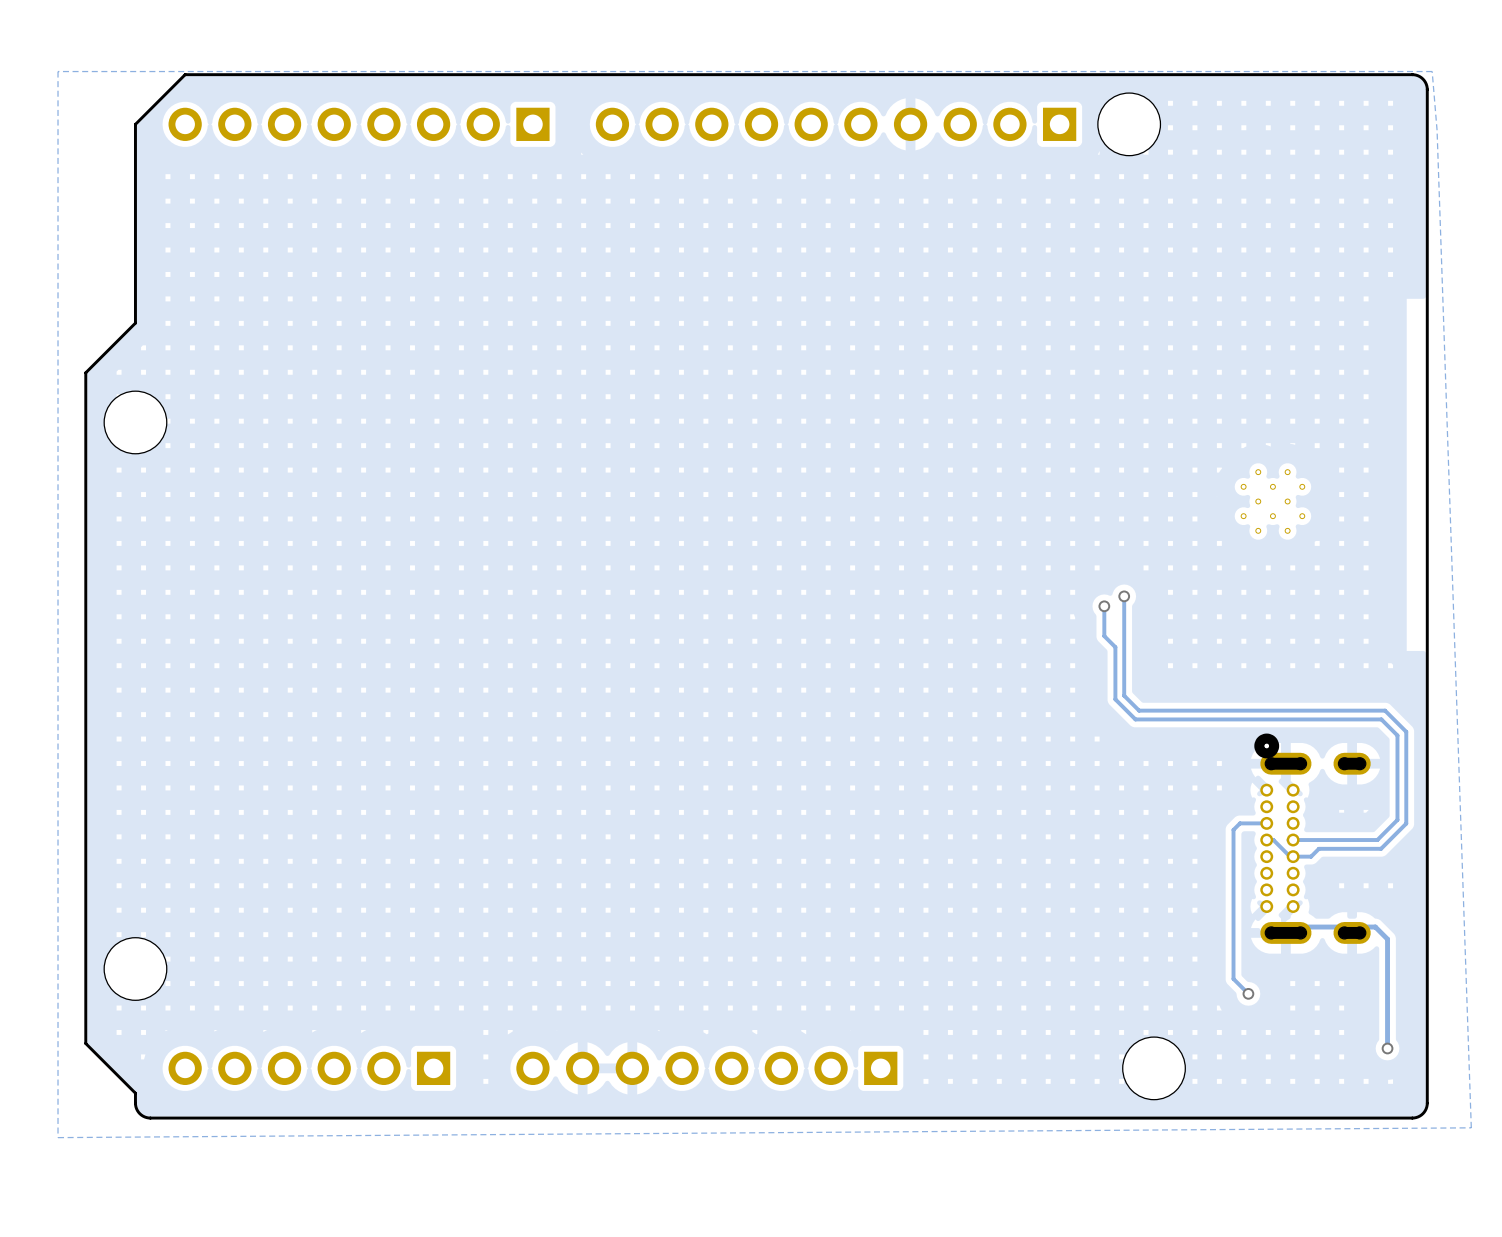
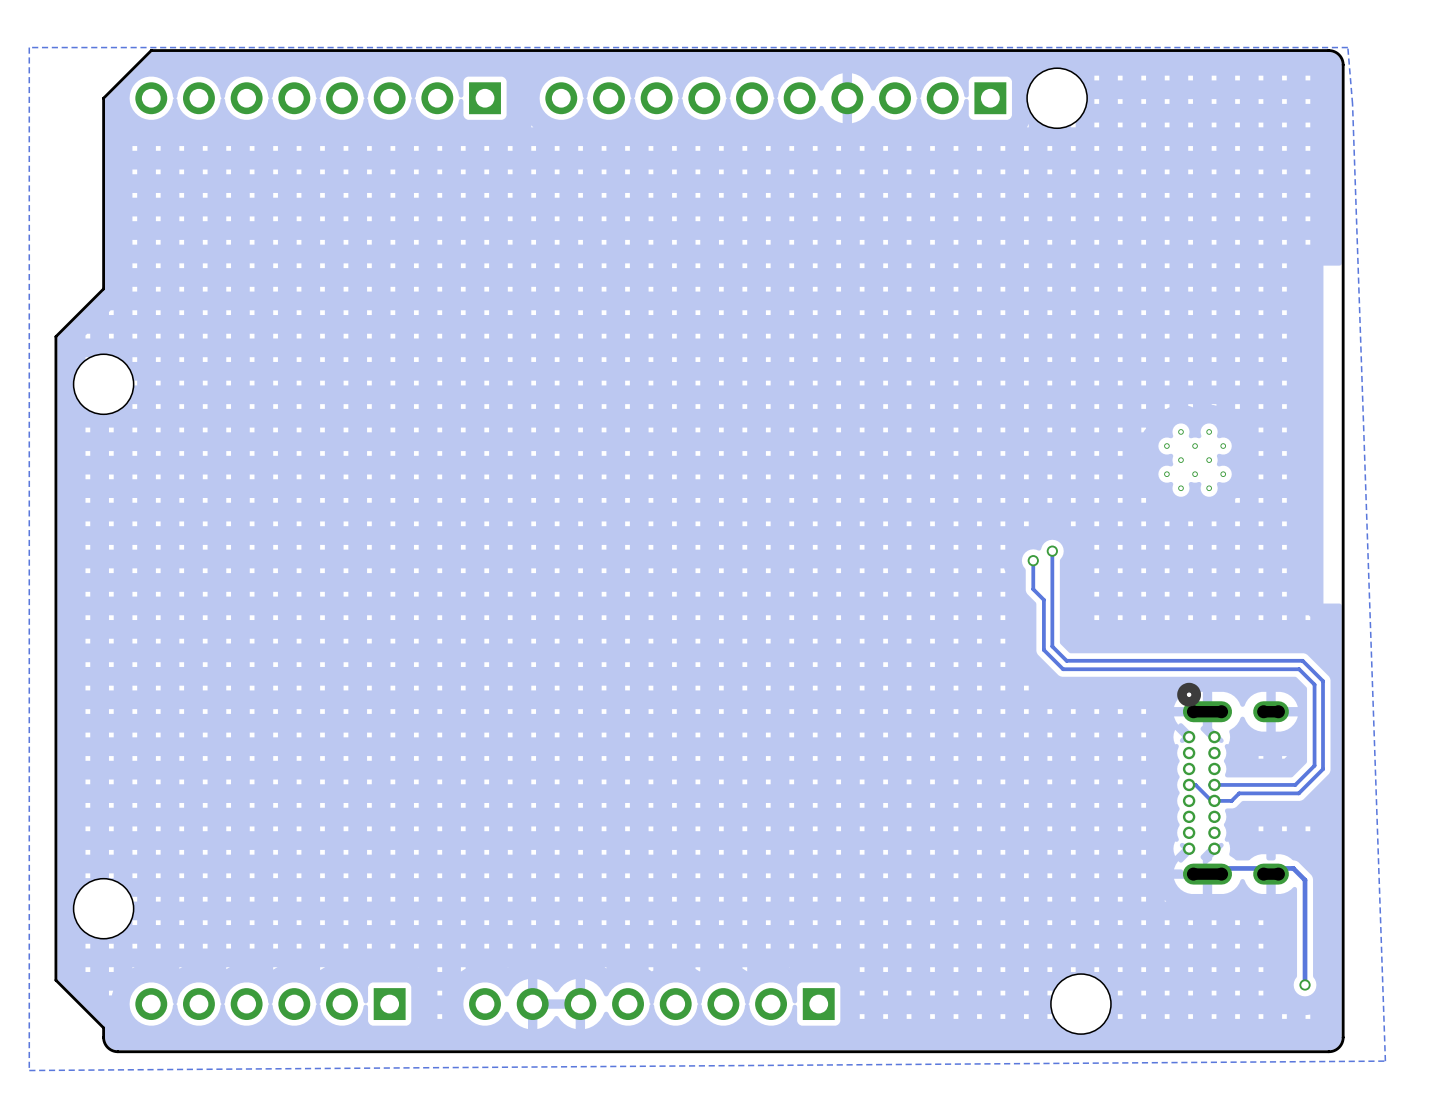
track: (1266, 823) (1240, 823) (1233, 829) (1233, 978) (1248, 993) -> none
via: (1248, 993) -> none

